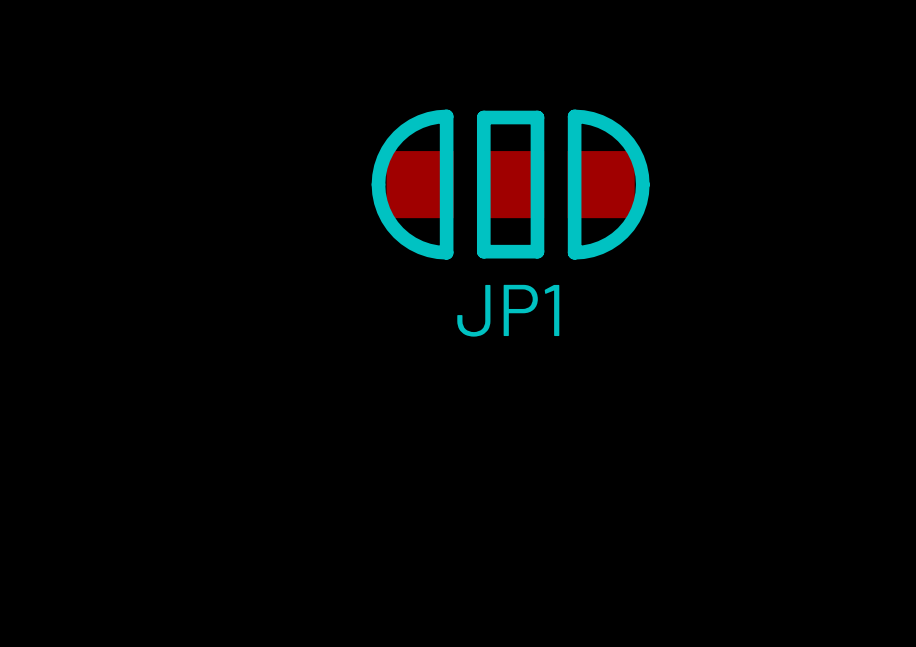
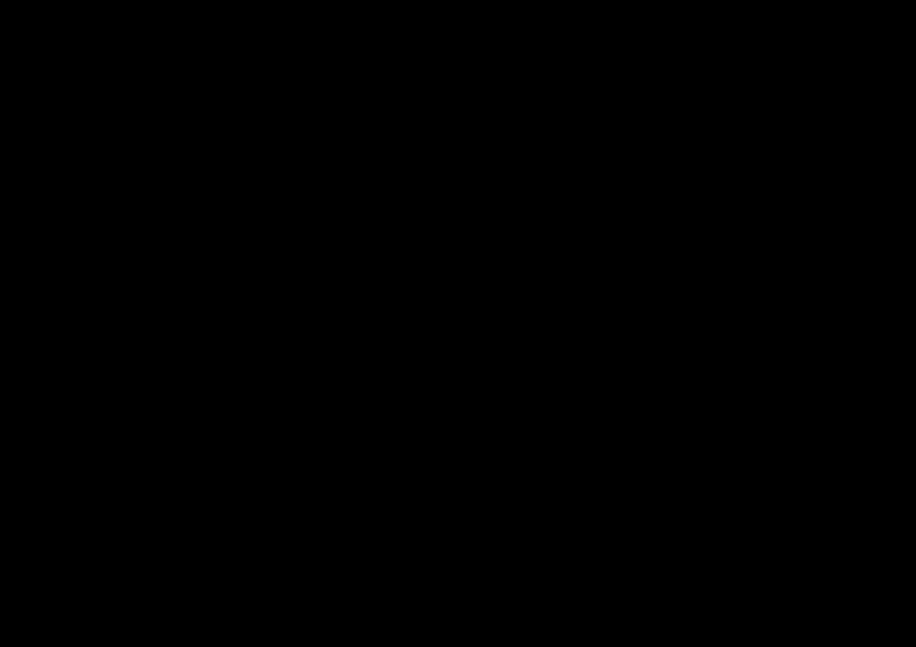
JP1: (510, 184) -> none

